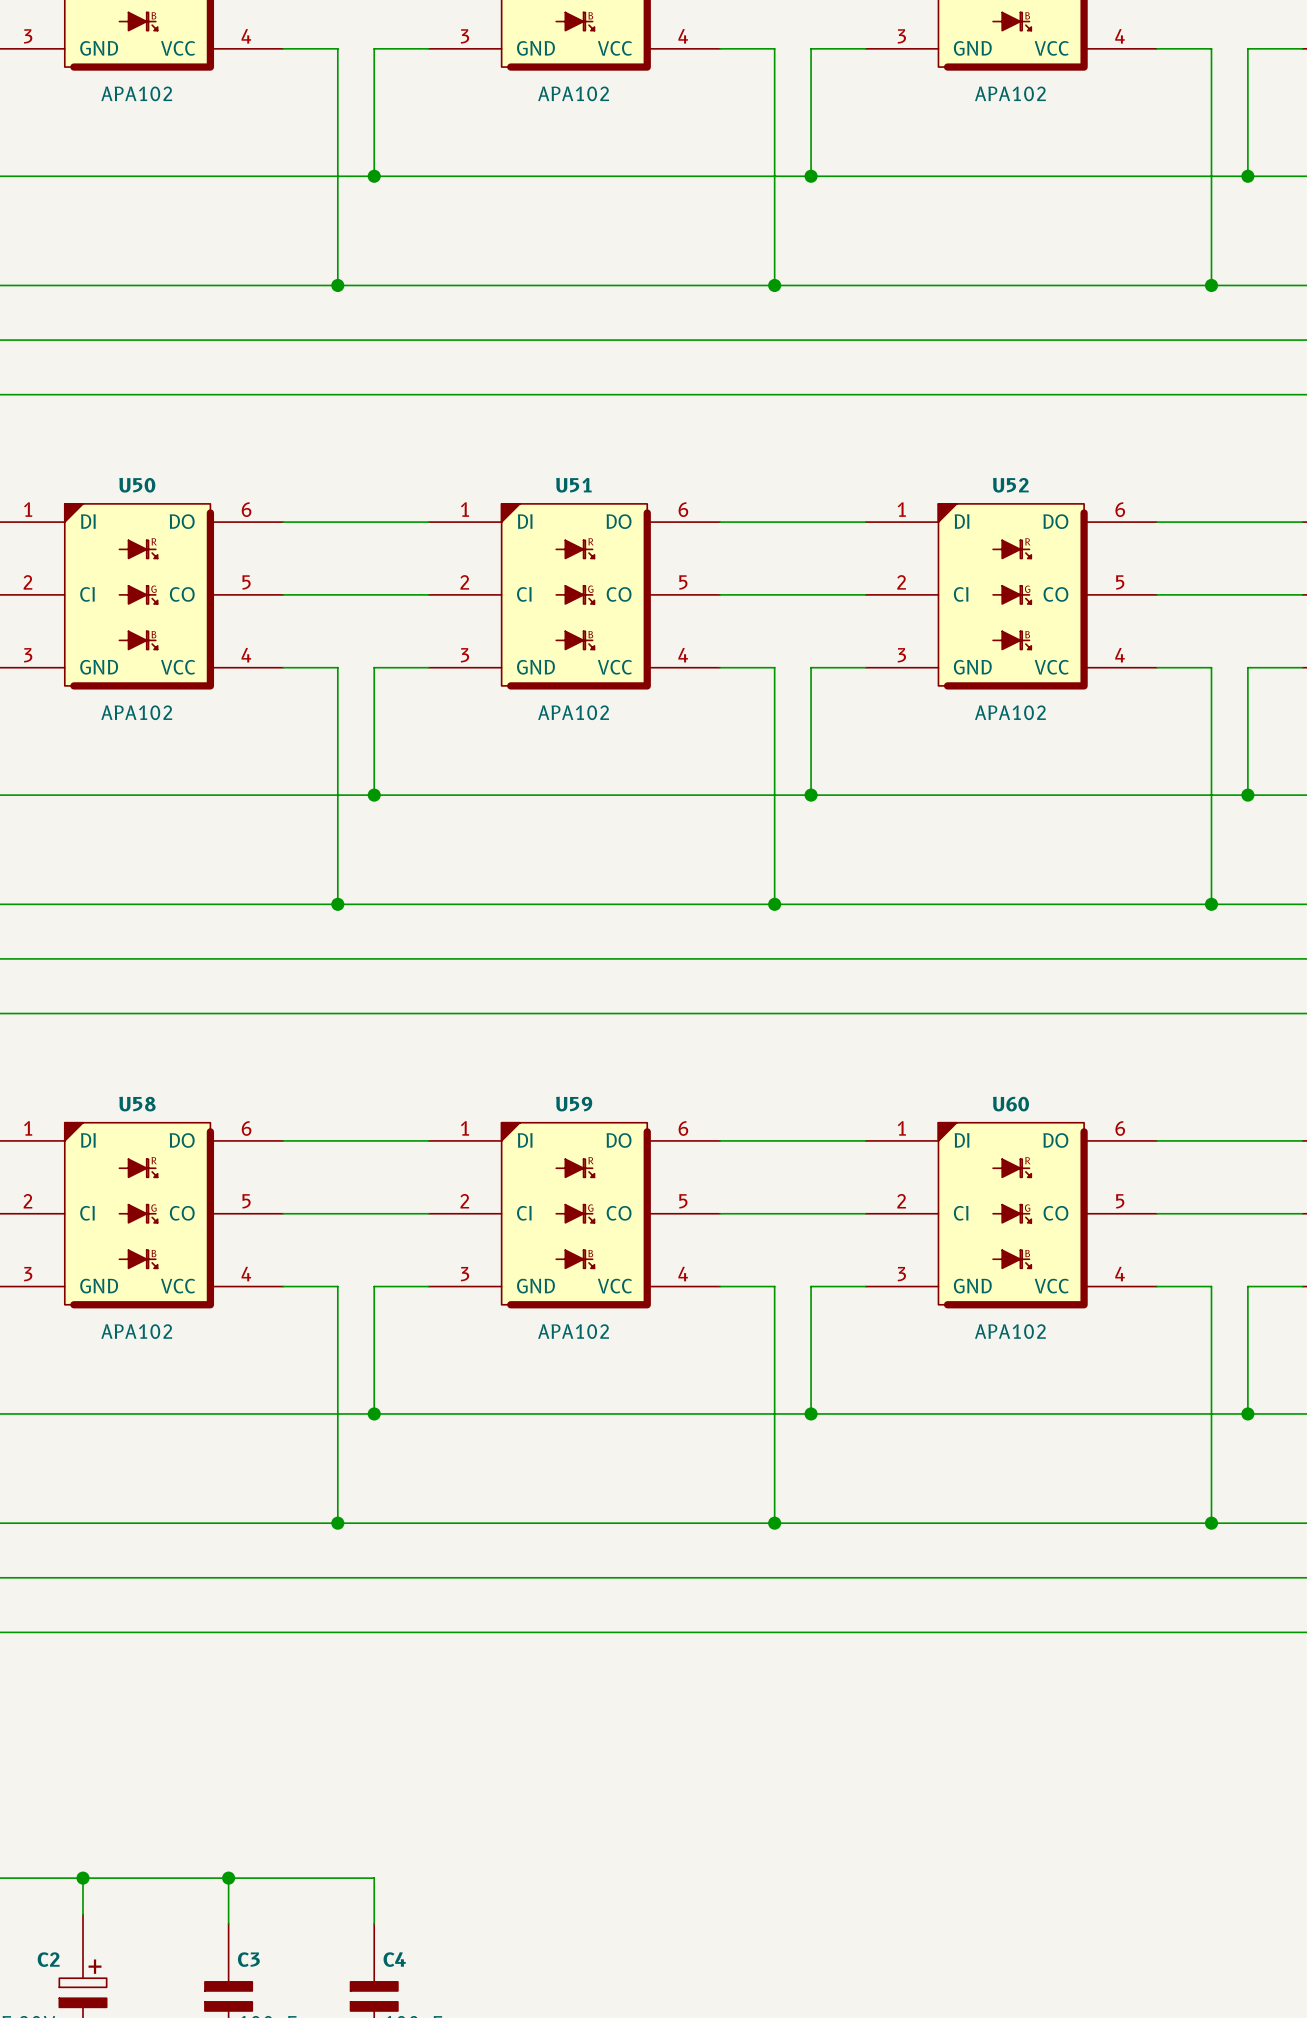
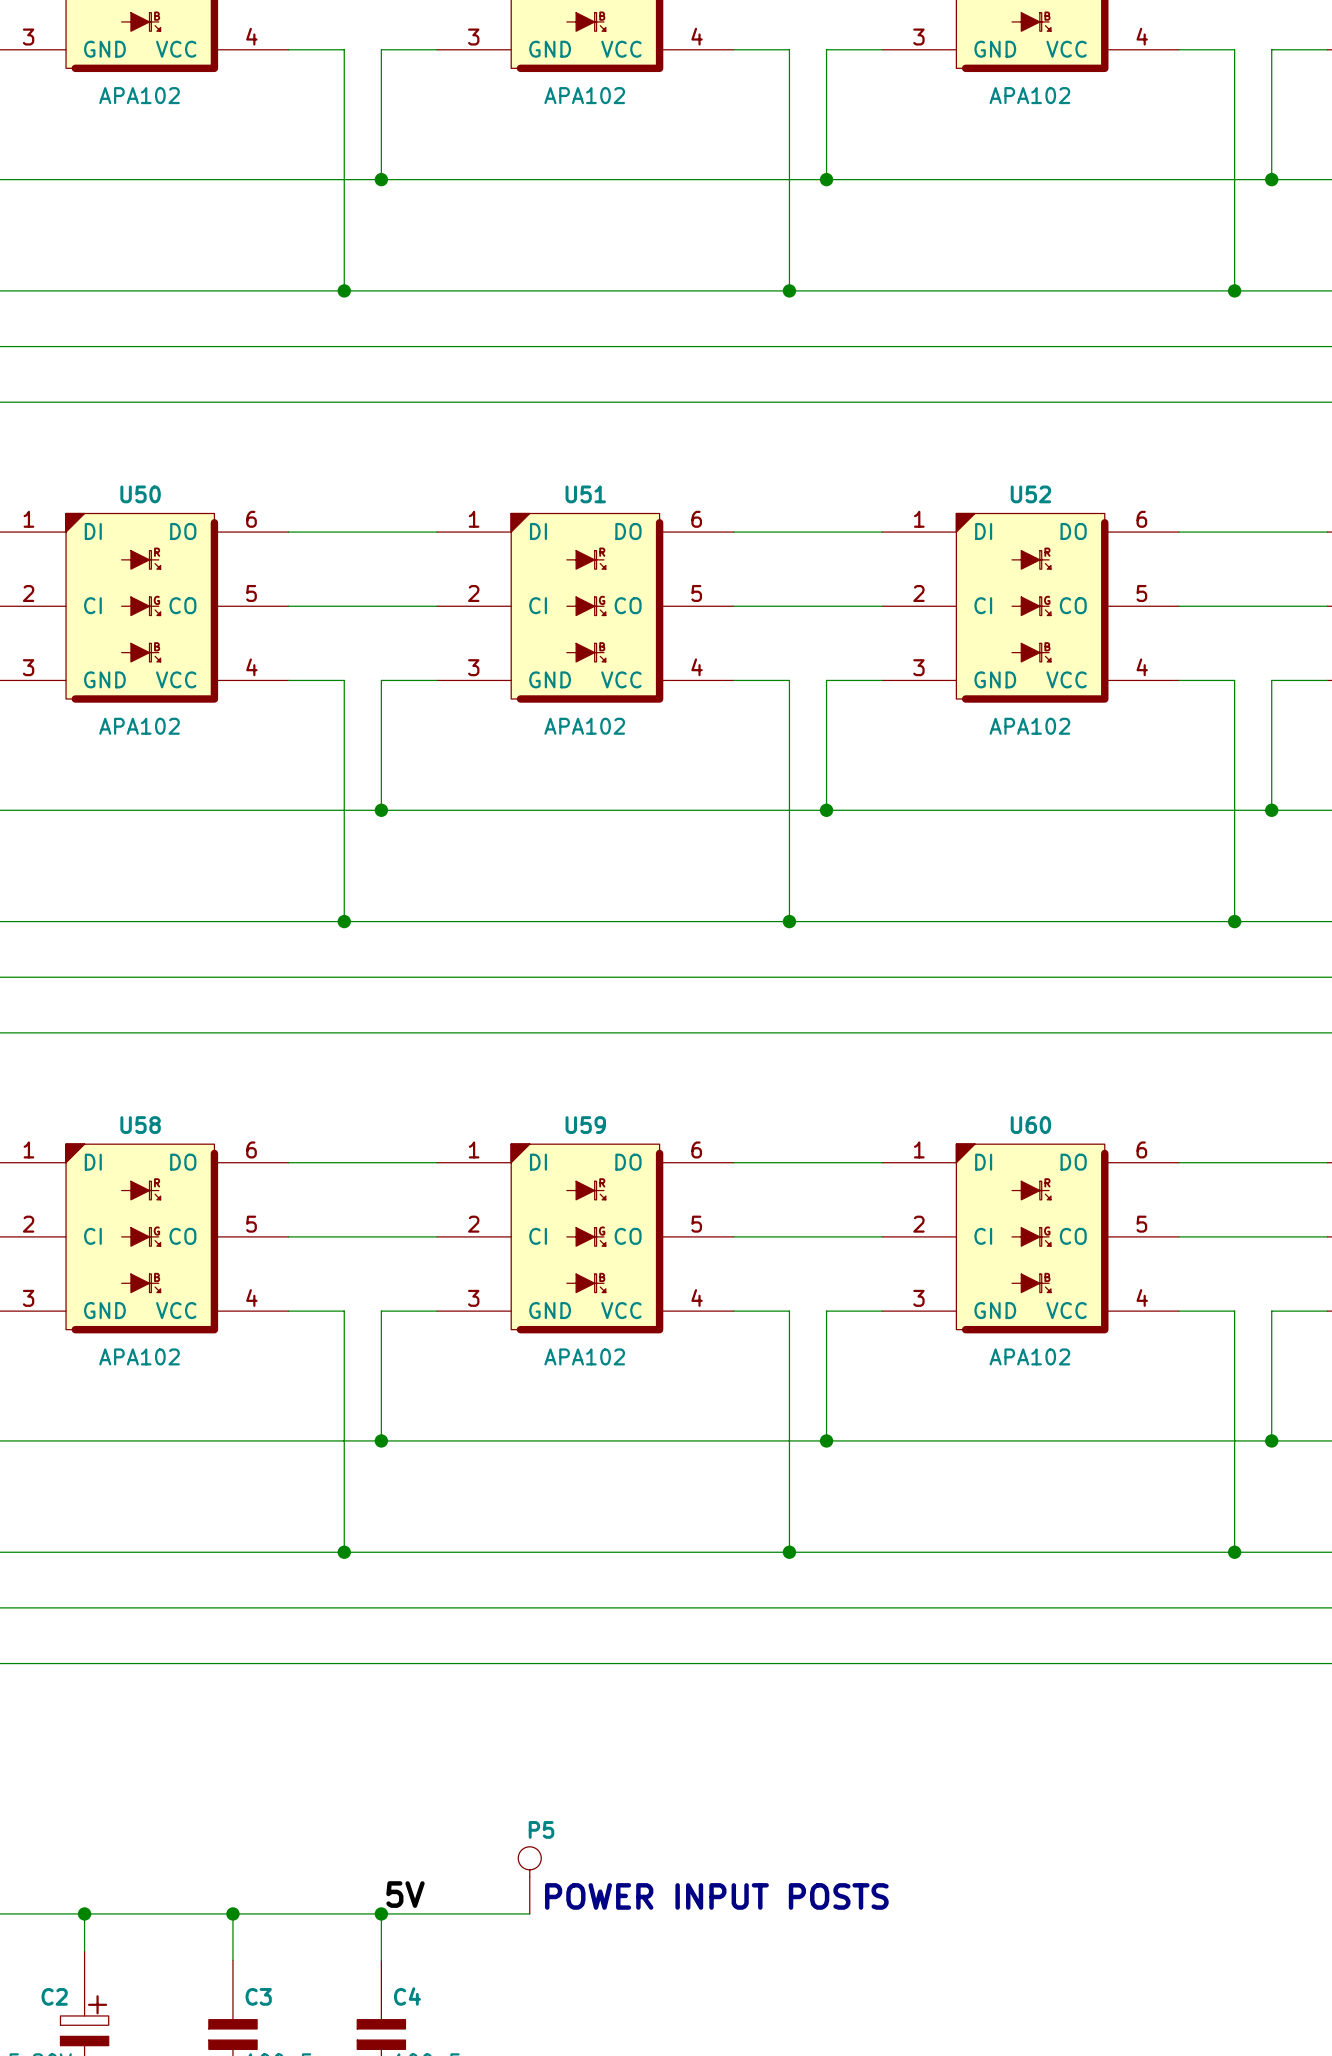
P5: none -> (529, 1880)
label: none -> 5V (405, 1894)
text: none -> POWER INPUT POSTS (716, 1896)
wire: none -> (381, 1913) (529, 1913)
junction: none -> (381, 1913)

